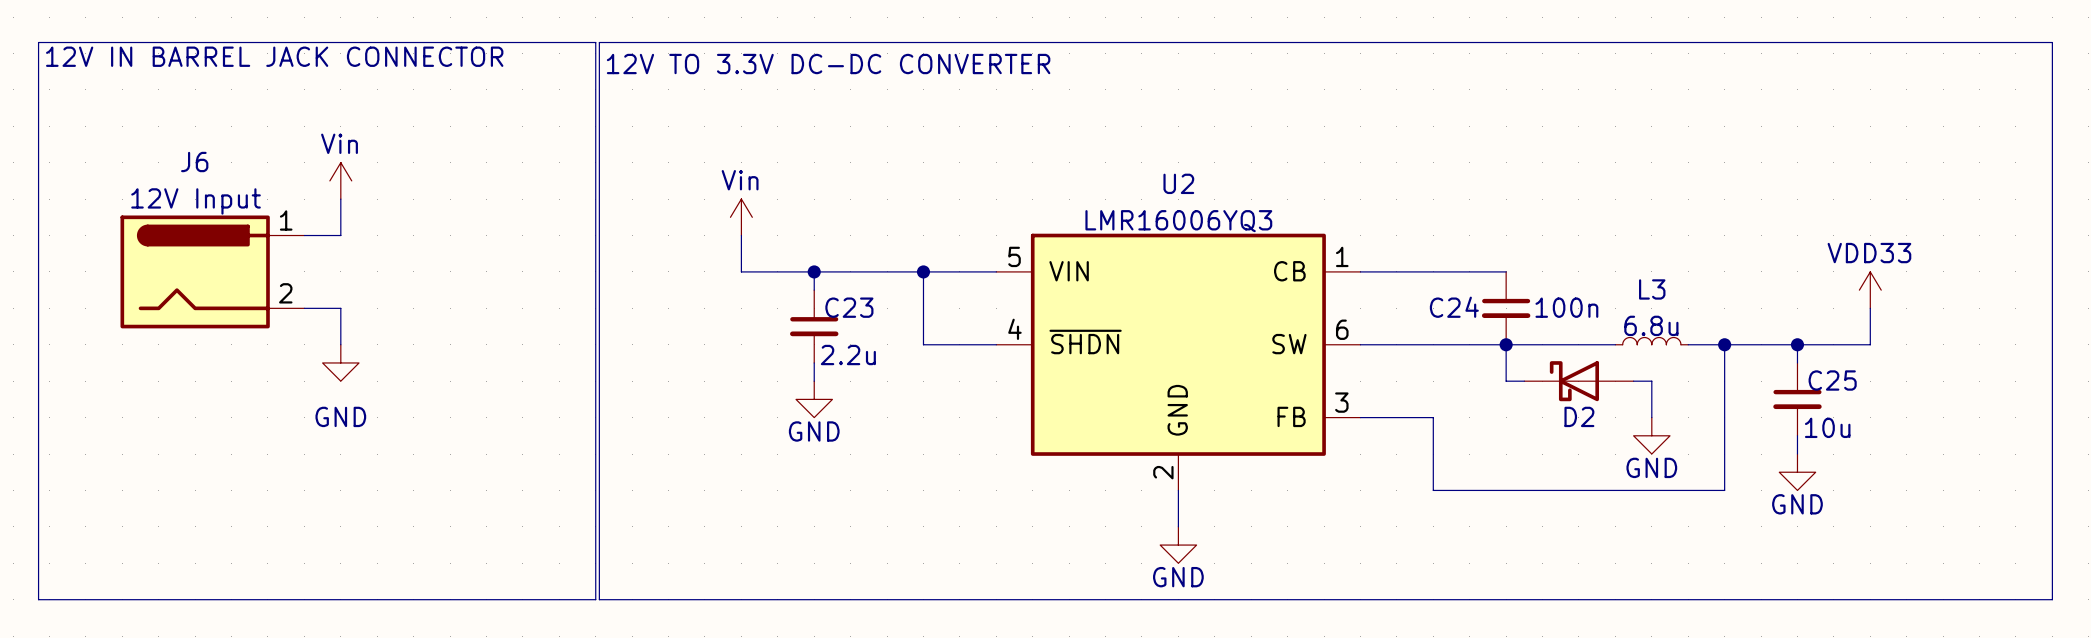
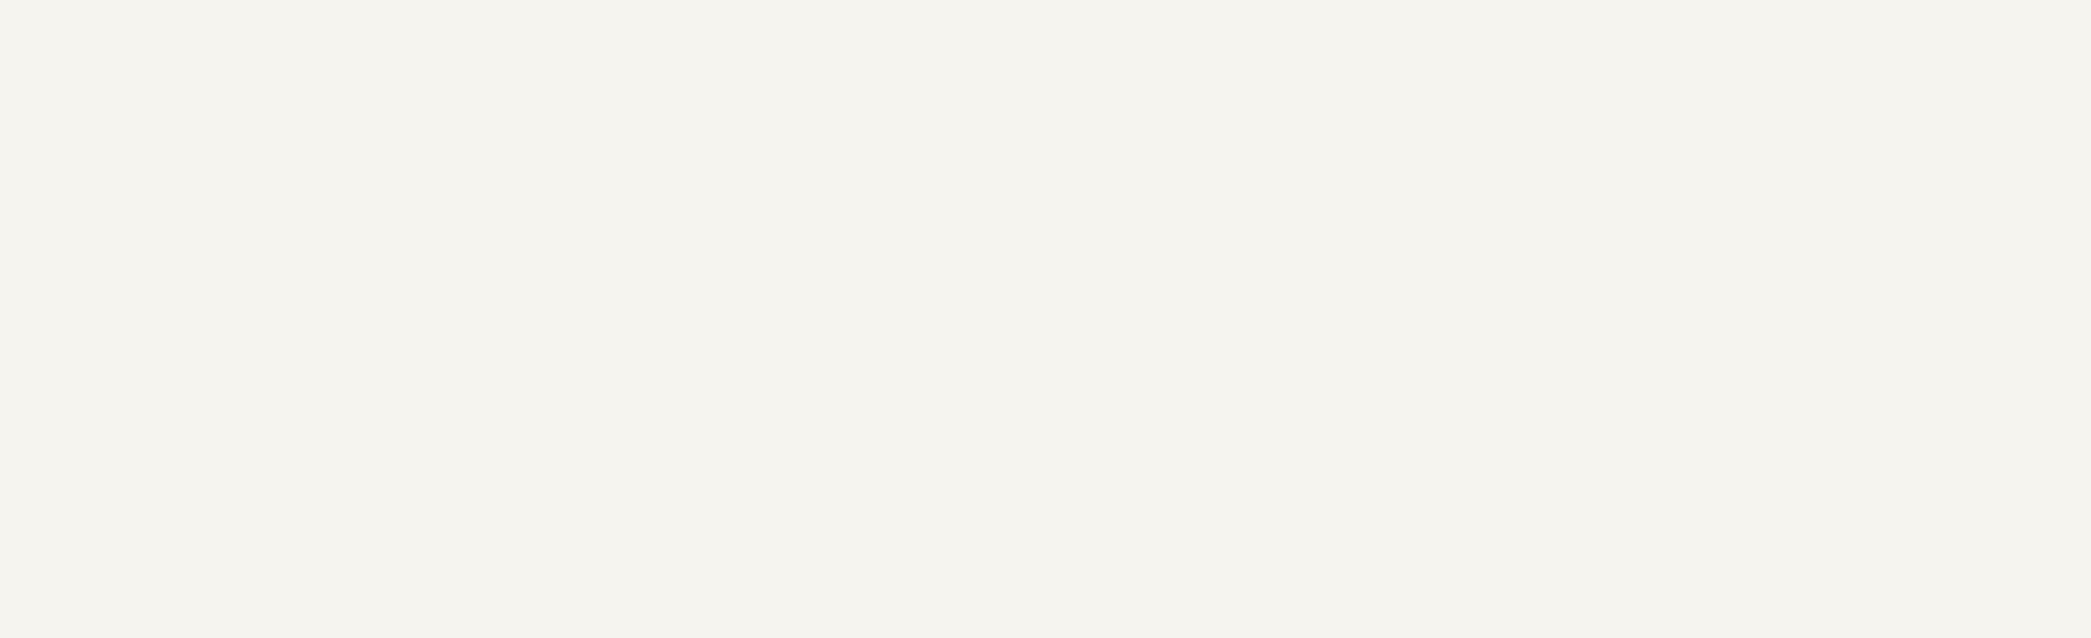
line: (38, 42) (595, 42) (595, 599) (38, 599) (38, 42) -> none
line: (599, 42) (2052, 42) (2052, 599) (599, 599) (599, 42) -> none
text: 12V IN BARREL JACK CONNECTOR (274, 56) -> none
text: 12V TO 3.3V DC-DC CONVERTER (828, 64) -> none
power symbol: Vin (340, 180) -> none
wire: (340, 199) (340, 235) (304, 235) -> none
power symbol: Vin (741, 217) -> none
wire: (741, 235) (741, 271) (996, 271) -> none
J6: 12V Input (212, 271) -> none
wire: (814, 271) (814, 290) -> none
junction: (814, 271) -> none
wire: (923, 271) (923, 344) (996, 344) -> none
junction: (923, 271) -> none
wire: (1360, 271) (1506, 271) -> none
power symbol: VDD33 (1870, 290) -> none
wire: (304, 308) (340, 308) (340, 344) -> none
C24: 100n (1506, 308) -> none
wire: (1870, 308) (1870, 344) (1688, 344) -> none
C23: 2.2u (814, 326) -> none
L3: 6.8u (1651, 341) -> none
wire: (1360, 344) (1615, 344) -> none
wire: (1506, 344) (1506, 381) (1524, 381) -> none
junction: (1506, 344) -> none
wire: (1724, 344) (1724, 490) (1433, 490) (1433, 417) (1360, 417) -> none
junction: (1724, 344) -> none
wire: (1797, 344) (1797, 362) -> none
junction: (1797, 344) -> none
power symbol: GND (340, 362) -> none
wire: (814, 362) (814, 381) -> none
U2: LMR16006YQ3 (1178, 362) -> none
D2: (1578, 381) -> none
wire: (1633, 381) (1651, 381) (1651, 417) -> none
power symbol: GND (814, 399) -> none
C25: 10u (1797, 399) -> none
power symbol: GND (1651, 435) -> none
wire: (1797, 435) (1797, 454) -> none
power symbol: GND (1797, 472) -> none
wire: (1178, 490) (1178, 526) -> none
power symbol: GND (1178, 545) -> none

